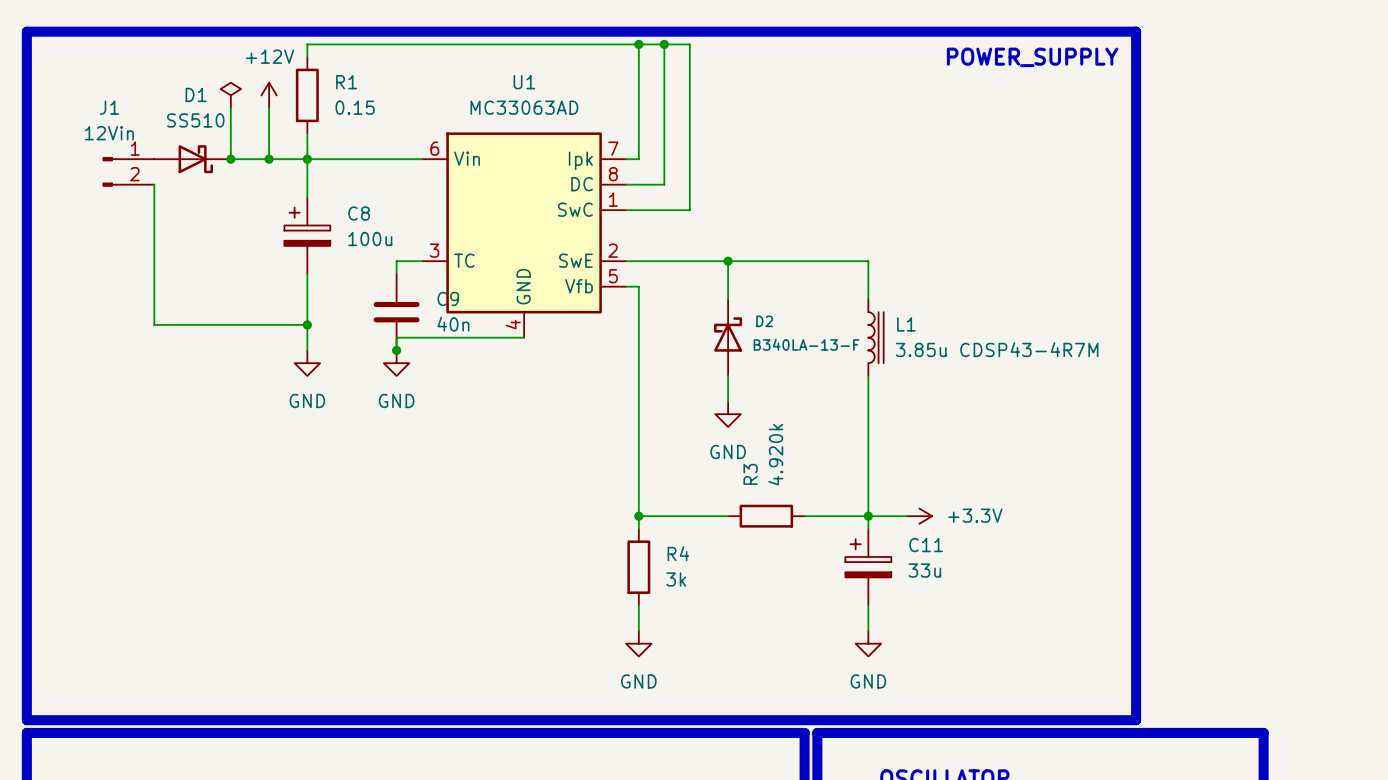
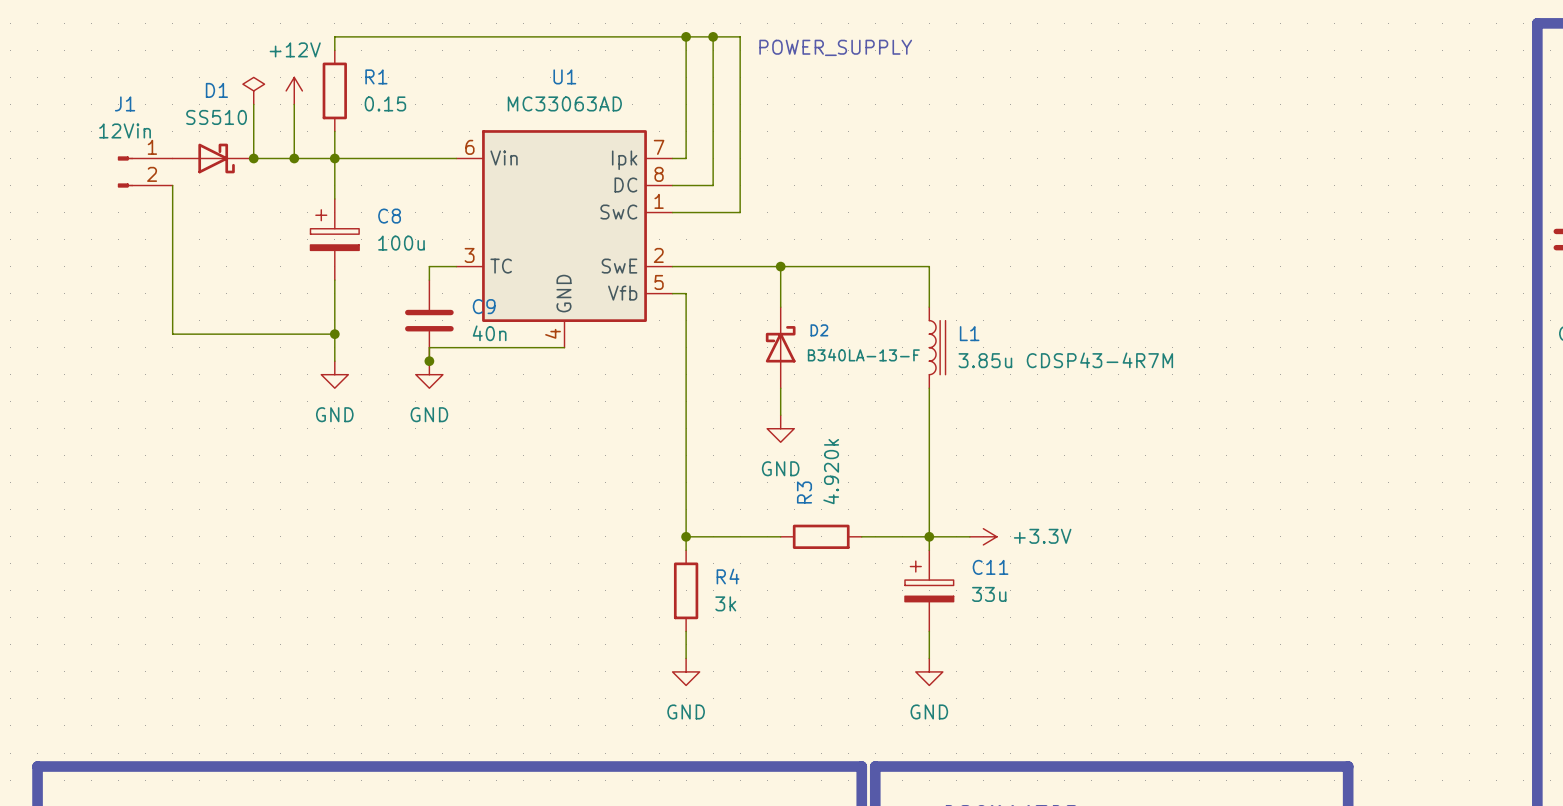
line: (26, 31) (26, 720) (1136, 720) (1136, 31) (26, 31) -> none
text: none -> POWER_SUPPLY (835, 47)
text: POWER_SUPPLY (1032, 57) -> none

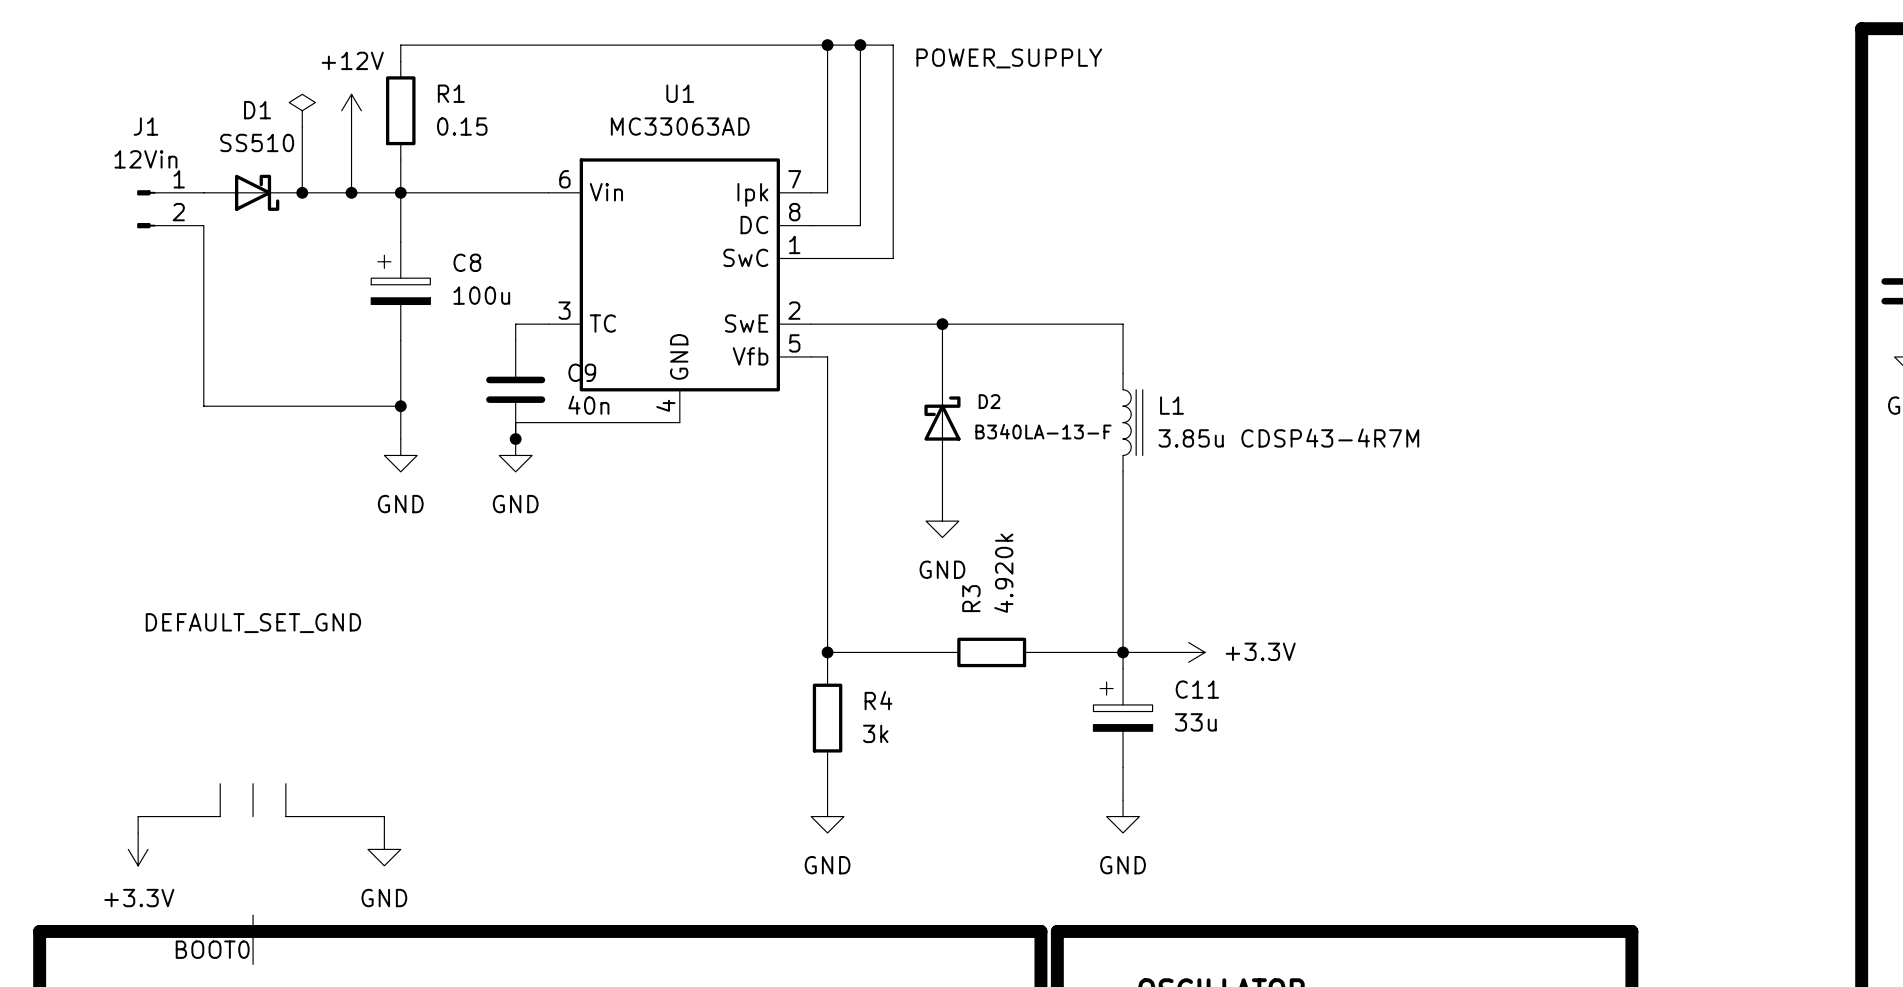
text: none -> DEFAULT_SET_GND (253, 623)
wire: none -> (220, 783) (220, 816) (138, 816) (138, 832)
wire: none -> (253, 783) (253, 816)
wire: none -> (285, 783) (285, 816) (384, 816) (384, 832)
power symbol: none -> +3.3V (138, 849)
power symbol: none -> GND (384, 849)
wire: none -> (253, 915) (253, 964)
label: none -> BOOT0 (212, 949)

